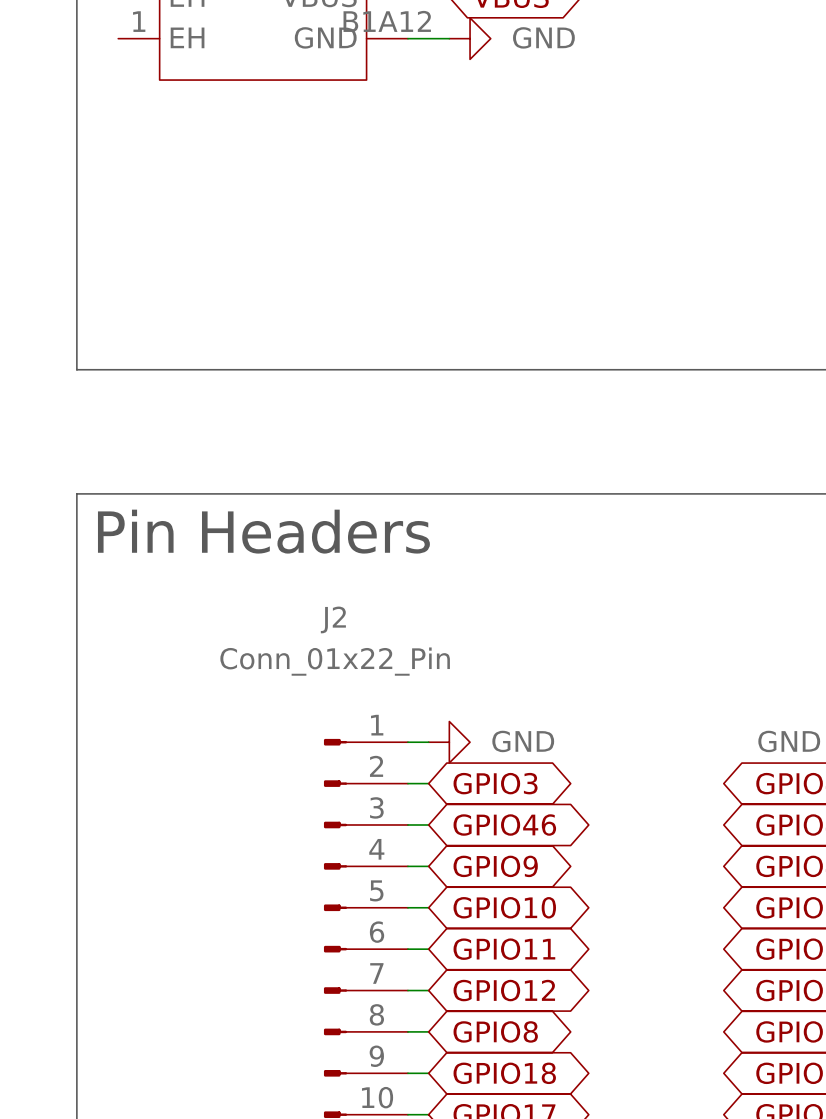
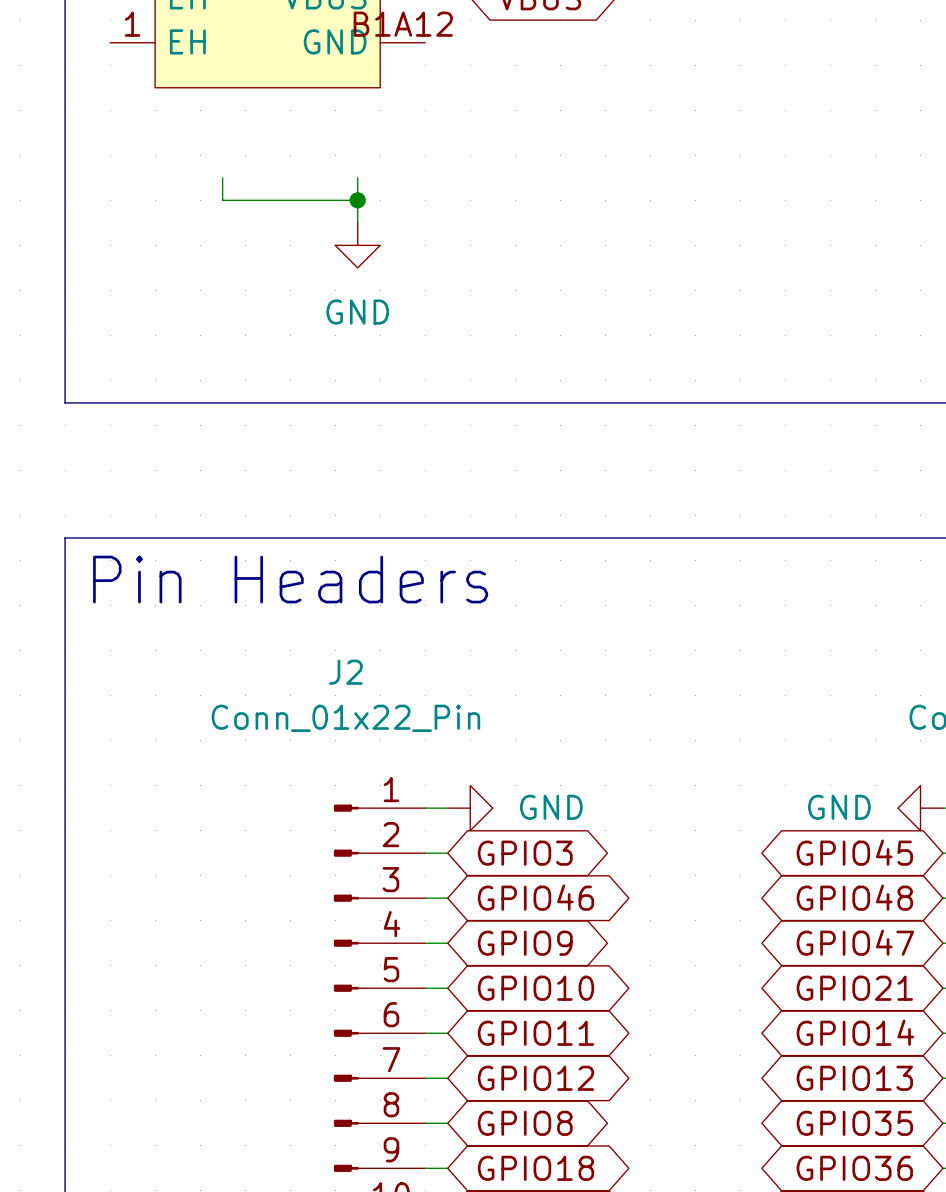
wire: (407, 38) (449, 38) -> none
power symbol rotation: 0° (470, 38) -> 90° clockwise (357, 245)
power symbol position: GND (470, 38) -> GND (357, 245)
wire: none -> (222, 177) (222, 200) (357, 200)
wire: none -> (357, 177) (357, 222)
junction: none -> (357, 200)

